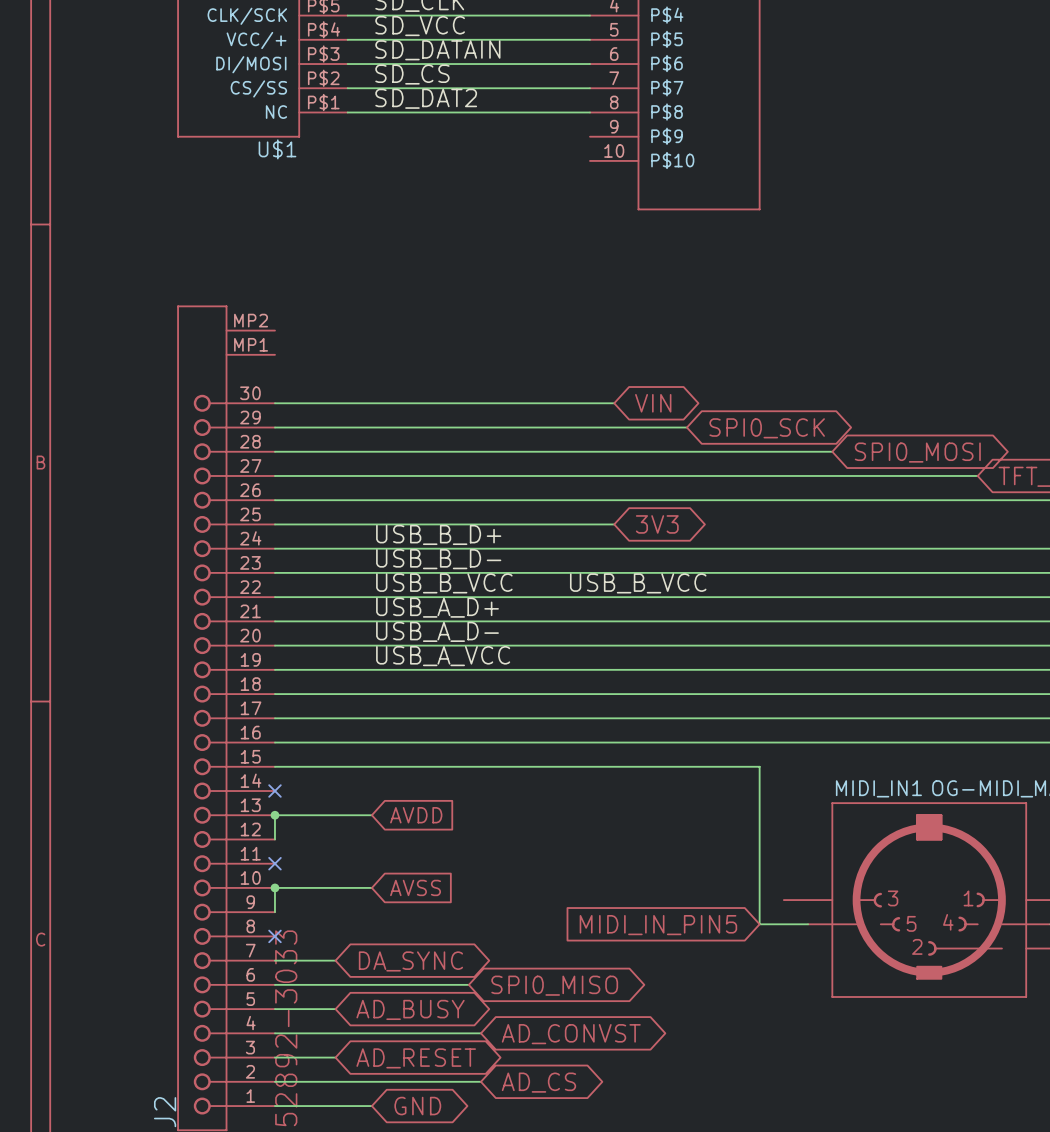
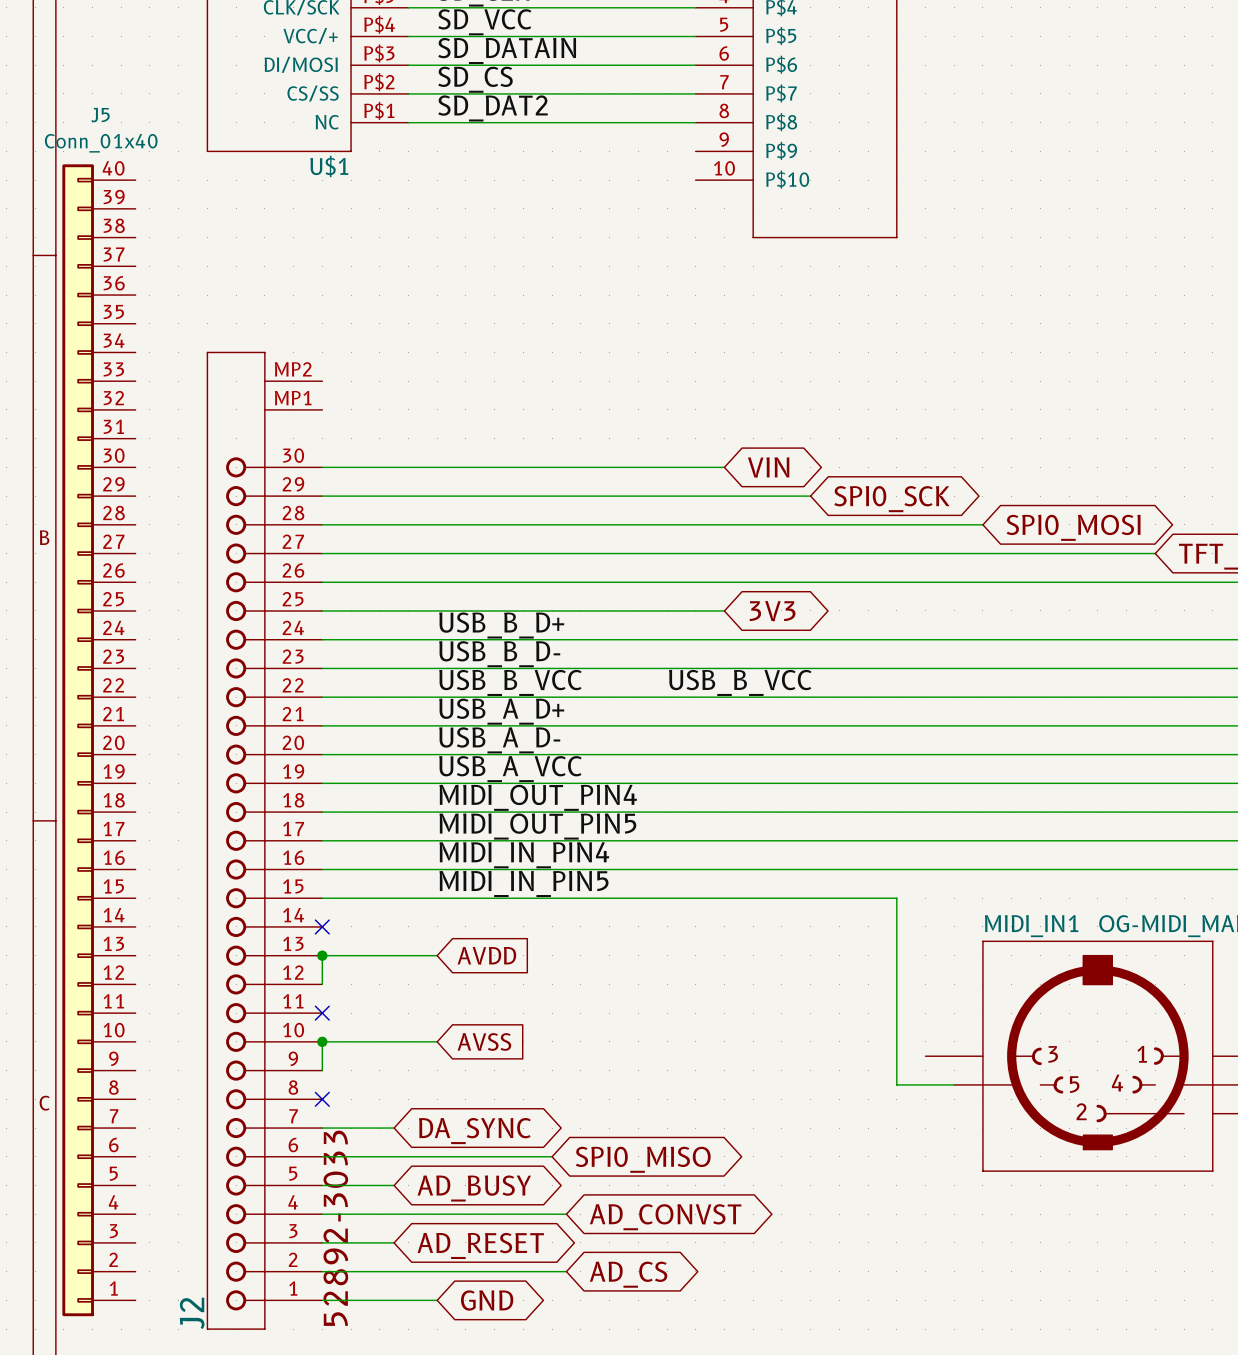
J5: none -> Conn_01x40 (98, 740)
label: none -> MIDI_OUT_PIN4 (538, 797)
label: none -> MIDI_OUT_PIN5 (537, 826)
label: none -> MIDI_IN_PIN4 (524, 855)
label: none -> MIDI_IN_PIN5 (523, 883)
global label: MIDI_IN_PIN5 (658, 925) -> none

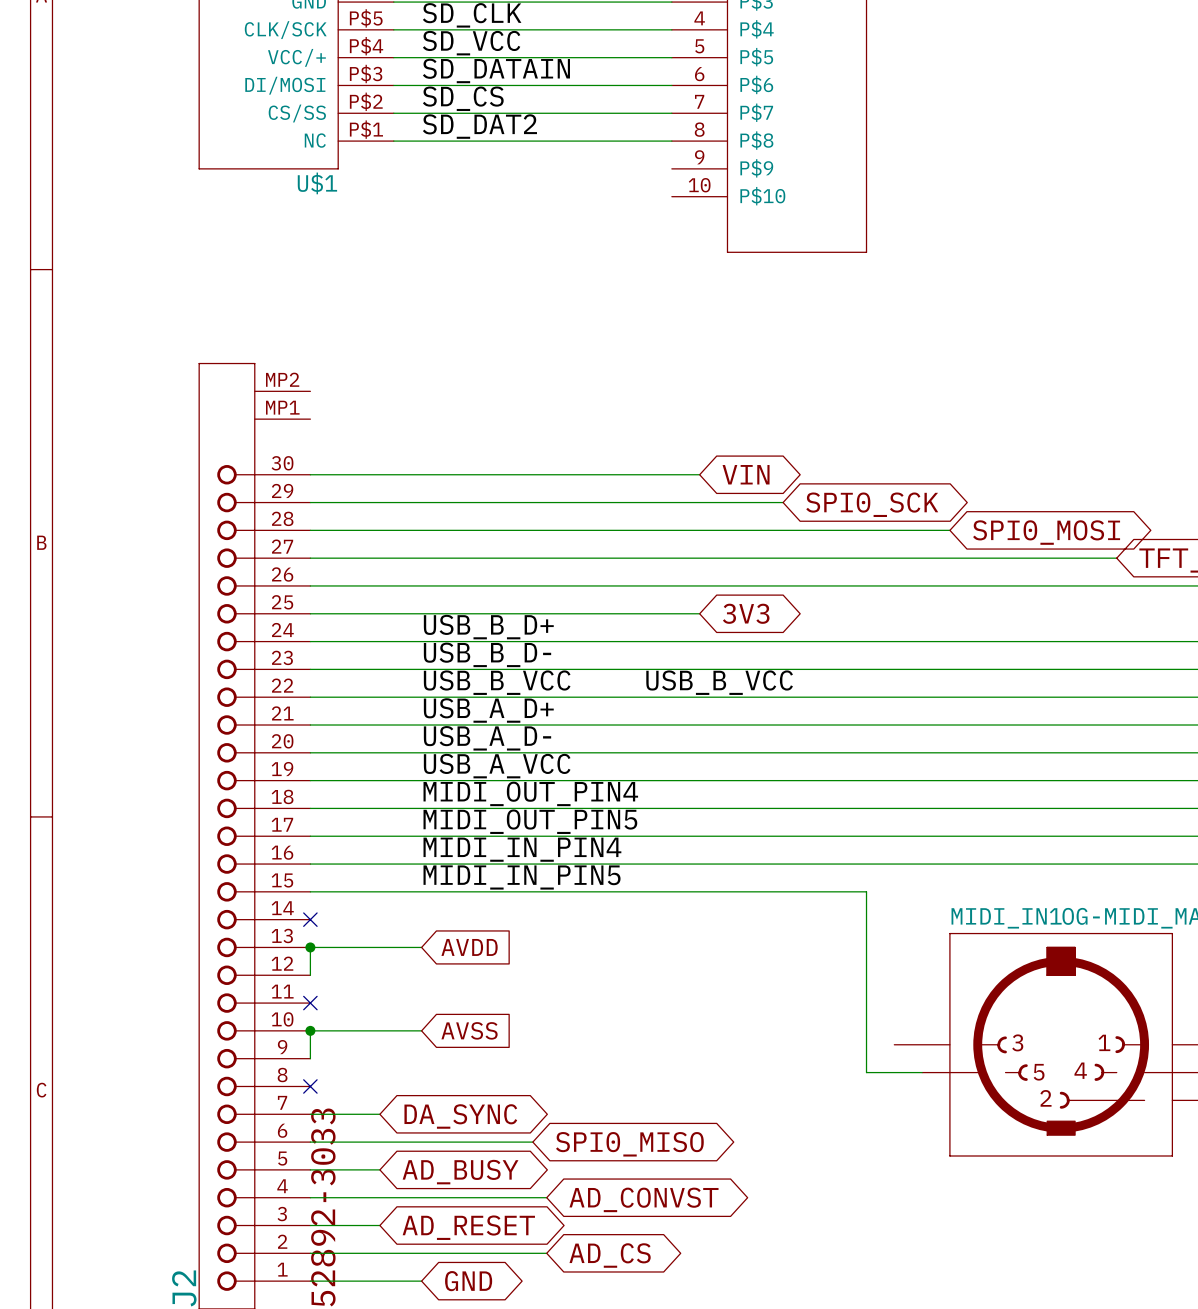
J5: Conn_01x40 (98, 740) -> none

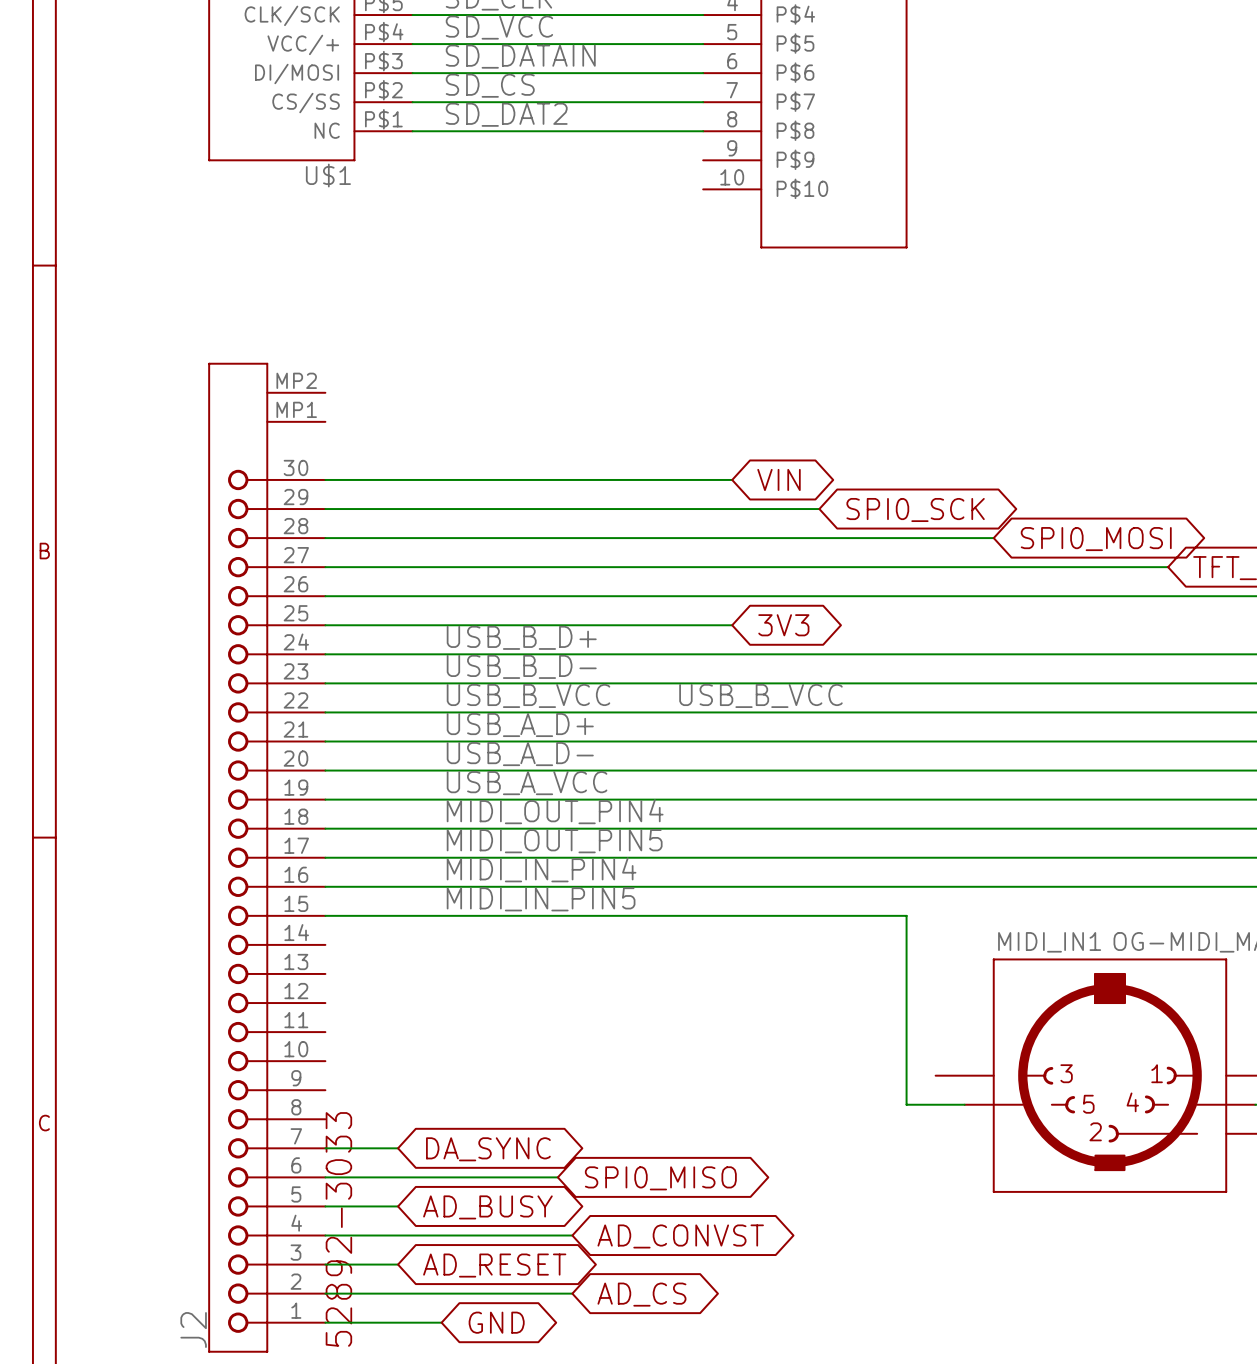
no-connect mark: (310, 919) -> none
junction: (310, 947) -> none
wire: (421, 947) (310, 947) (310, 975) -> none
global label: AVDD (469, 947) -> none
no-connect mark: (310, 1003) -> none
junction: (310, 1030) -> none
wire: (421, 1030) (310, 1030) (310, 1058) -> none
global label: AVSS (469, 1030) -> none
no-connect mark: (310, 1086) -> none

